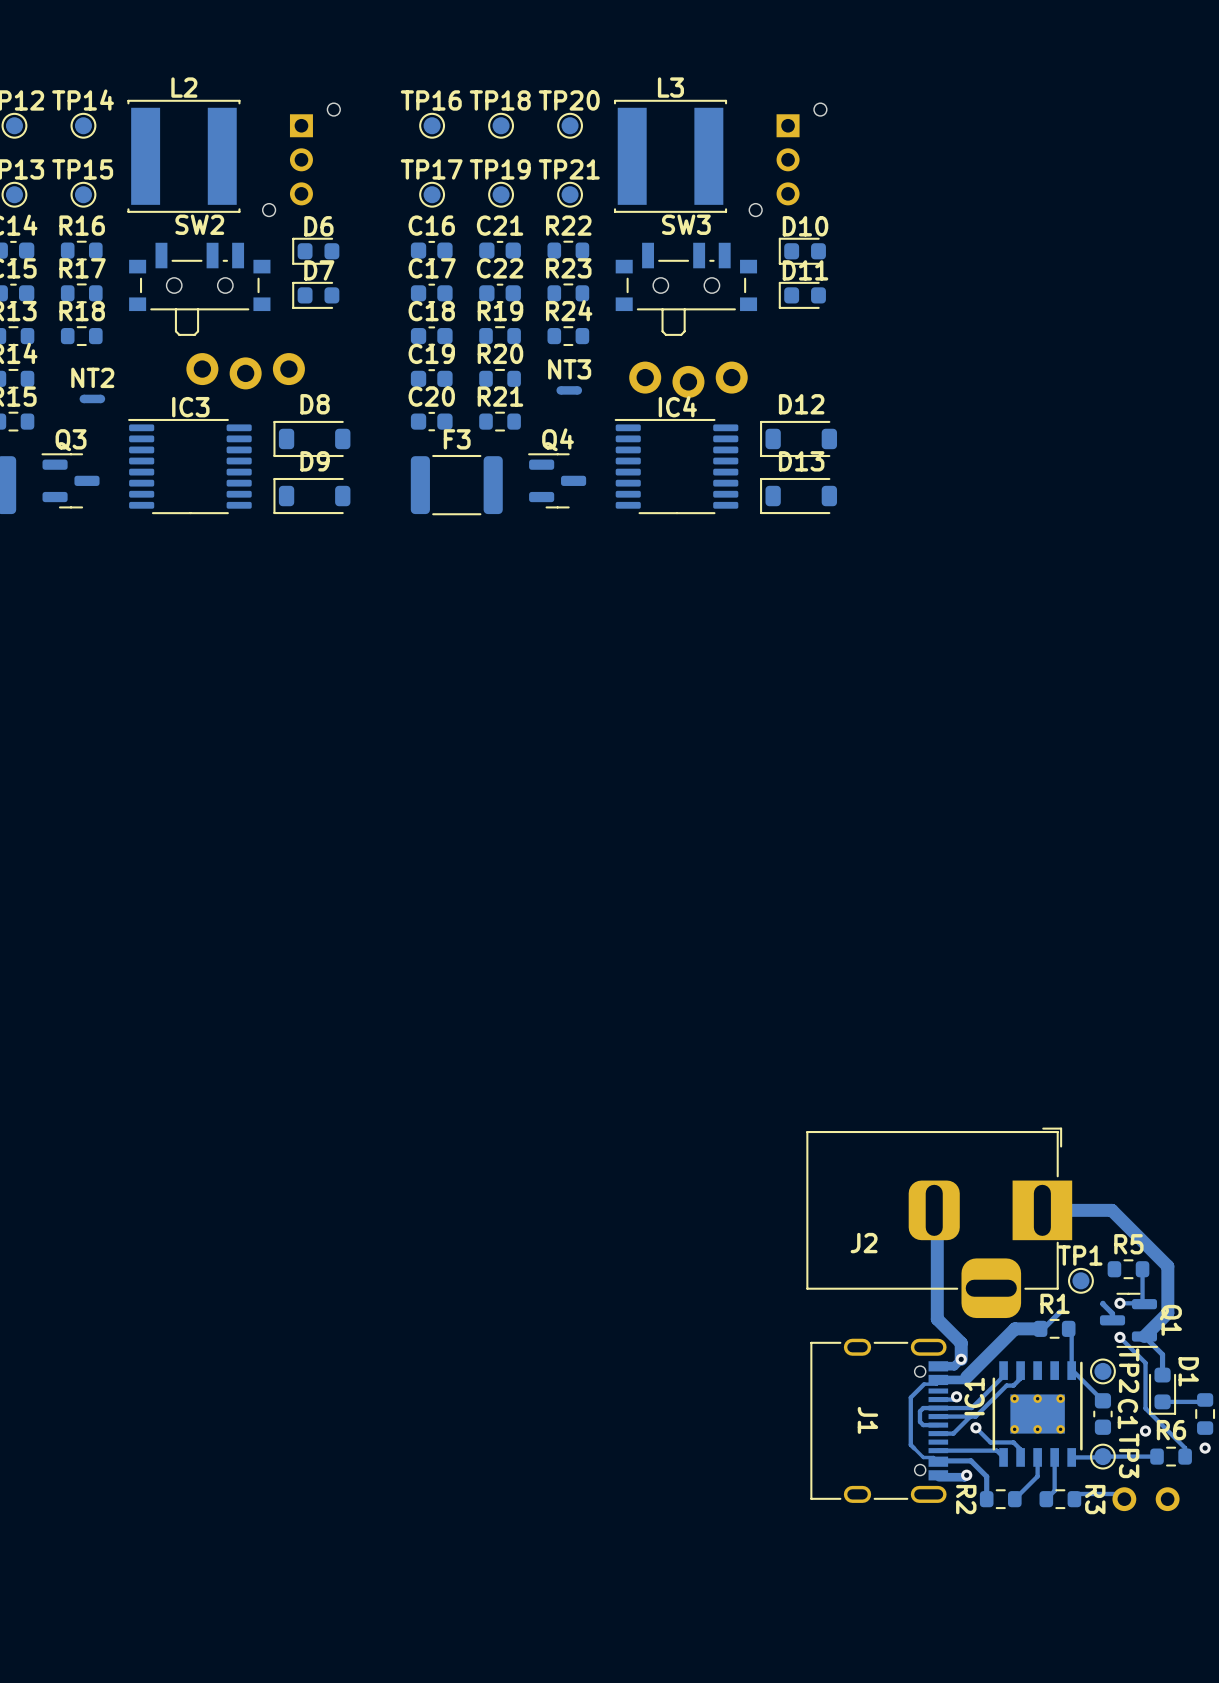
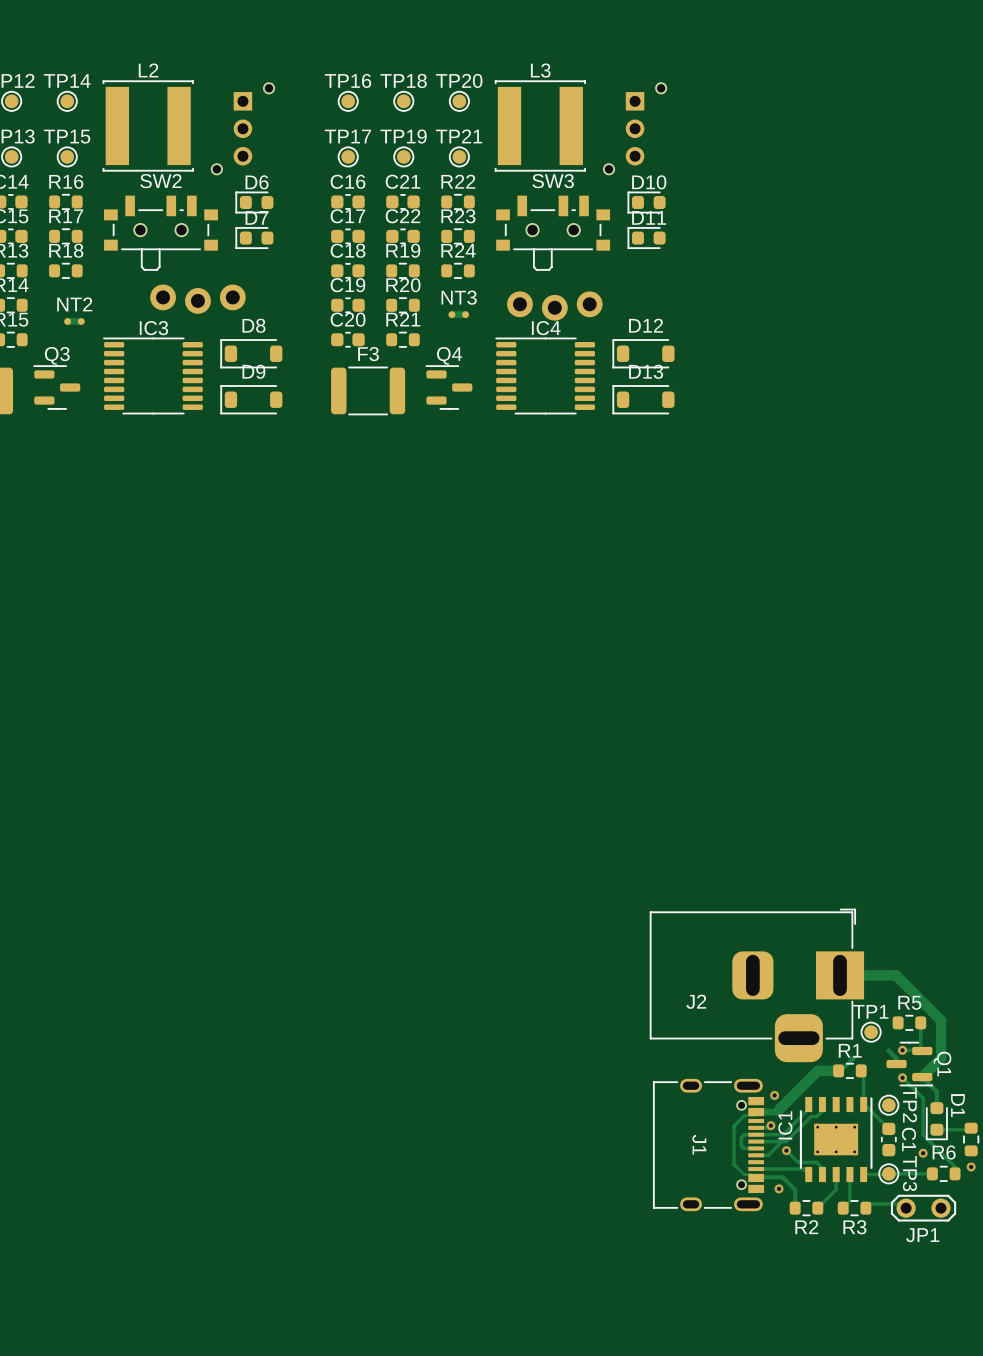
track: (934, 1210) (937, 1213) (937, 1319) (961, 1343) (961, 1359) (954, 1366) (941, 1366) -> none
track: (966, 1475) (964, 1477) (938, 1477) -> none
R2 name rotation: 0° (966, 1499) -> 90° counterclockwise (806, 1227)
R2 name position: R2 (966, 1499) -> R2 (806, 1227)
R3 name rotation: 0° (1095, 1499) -> 90° counterclockwise (854, 1227)
JP1 side: top (1146, 1499) -> bottom (923, 1208)

